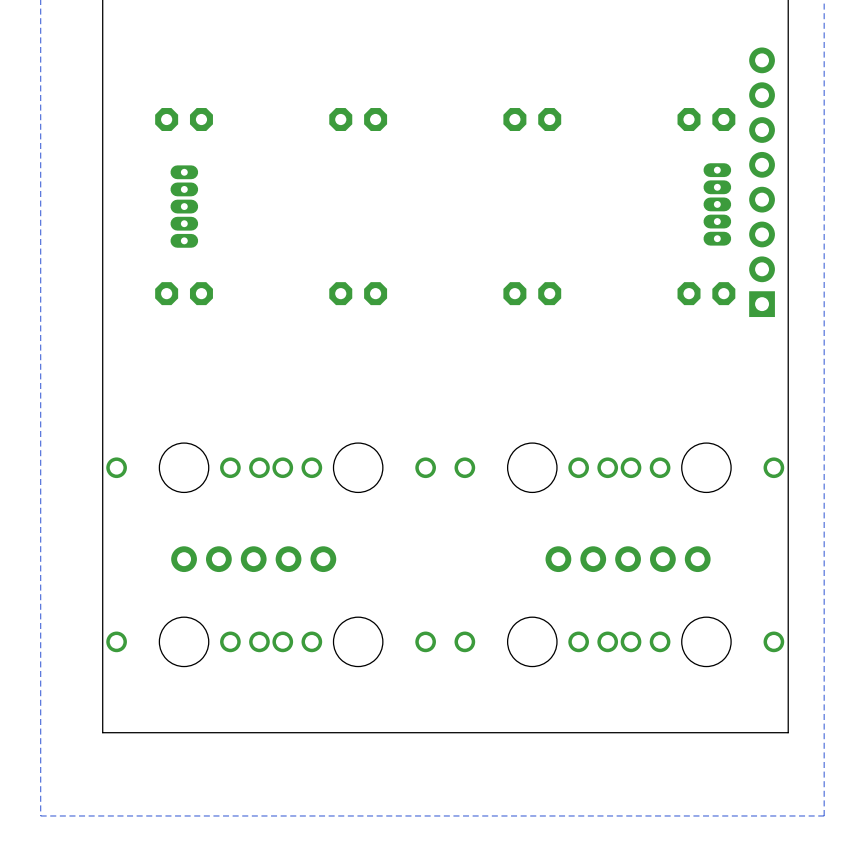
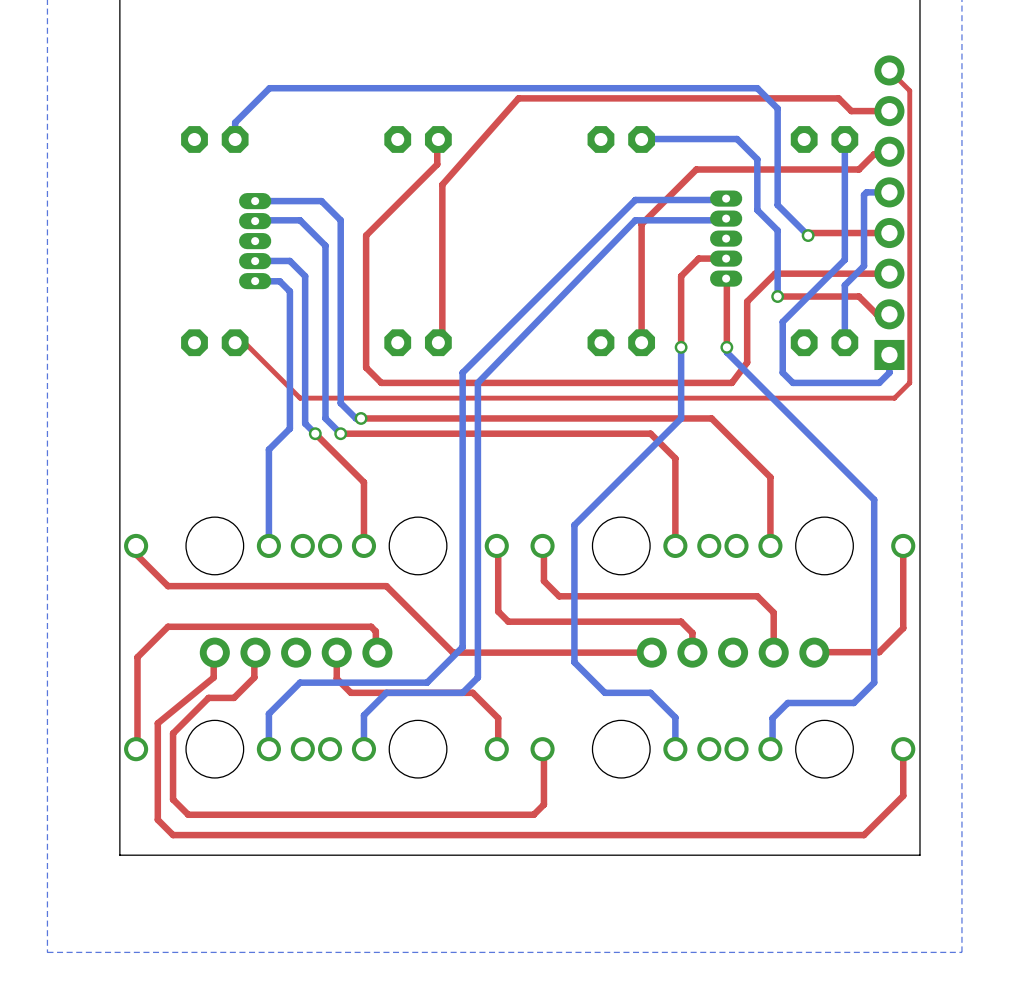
top track: none -> (889, 70) (909, 90) (909, 382) (894, 398) (300, 398) (244, 342) (235, 342)
top track: none -> (889, 111) (851, 111) (838, 98) (518, 98) (442, 184) (442, 338) (438, 342)
bottom track: none -> (235, 139) (235, 122) (269, 88) (757, 88) (777, 108) (777, 205) (808, 235)
top track: none -> (438, 139) (437, 164) (366, 235) (366, 367) (381, 382) (731, 382) (747, 362) (747, 301) (775, 273) (889, 273)
bottom track: none -> (641, 139) (737, 139) (757, 159) (757, 210) (777, 230) (777, 296)
bottom track: none -> (844, 139) (844, 259) (782, 321) (782, 372) (792, 382) (879, 382) (889, 372) (889, 354)
top track: none -> (889, 151) (886, 154) (874, 154) (858, 169) (696, 169) (641, 224) (641, 342)
bottom track: none -> (889, 192) (866, 192) (864, 194) (864, 266) (844, 285) (844, 342)
bottom track: none -> (726, 198) (635, 199) (462, 372) (462, 647) (427, 682) (300, 682) (268, 713) (268, 749)
bottom track: none -> (255, 201) (321, 201) (340, 220) (340, 403) (355, 418) (361, 418)
bottom track: none -> (726, 218) (724, 220) (635, 220) (477, 382) (477, 677) (462, 692) (386, 692) (363, 715) (363, 749)
bottom track: none -> (255, 221) (300, 220) (325, 245) (325, 418) (340, 433)
top track: none -> (889, 233) (810, 233) (808, 235)
via: none -> (808, 235)
part position: (717, 204) -> (726, 238)
part position: (184, 206) -> (255, 241)
top track: none -> (726, 258) (698, 258) (681, 276) (681, 347)
bottom track: none -> (255, 260) (289, 260) (305, 276) (305, 423) (315, 433)
top track: none -> (726, 278) (726, 347)
bottom track: none -> (255, 281) (279, 281) (289, 291) (289, 428) (268, 449) (268, 545)
top track: none -> (777, 296) (858, 296) (876, 314) (889, 314)
via: none -> (777, 296)
bottom track: none -> (681, 347) (681, 418) (574, 525) (574, 662) (604, 692) (650, 692) (675, 717) (675, 749)
via: none -> (681, 347)
bottom track: none -> (726, 347) (726, 352) (874, 499) (874, 682) (853, 702) (787, 702) (772, 718) (772, 747) (770, 749)
via: none -> (726, 347)
top track: none -> (361, 418) (711, 418) (770, 477) (770, 545)
via: none -> (361, 418)
top track: none -> (315, 433) (363, 482) (363, 545)
via: none -> (315, 433)
top track: none -> (340, 433) (650, 433) (675, 458) (675, 545)
via: none -> (340, 433)
top track: none -> (136, 545) (137, 555) (167, 586) (386, 586) (452, 652) (651, 652)
top track: none -> (496, 545) (498, 611) (508, 621) (681, 621) (692, 632) (692, 652)
top track: none -> (542, 545) (543, 581) (559, 596) (757, 596) (773, 612) (773, 652)
top track: none -> (903, 545) (903, 628) (879, 652) (814, 652)
top track: none -> (214, 652) (213, 677) (157, 723) (157, 819) (173, 835) (864, 835) (903, 795) (903, 749)
top track: none -> (255, 652) (254, 677) (234, 697) (208, 697) (173, 733) (173, 799) (188, 814) (533, 814) (543, 804) (542, 749)
top track: none -> (336, 652) (336, 678) (350, 692) (472, 692) (498, 718) (496, 749)
top track: none -> (375, 652) (375, 631) (371, 626) (167, 626) (137, 657) (136, 749)

